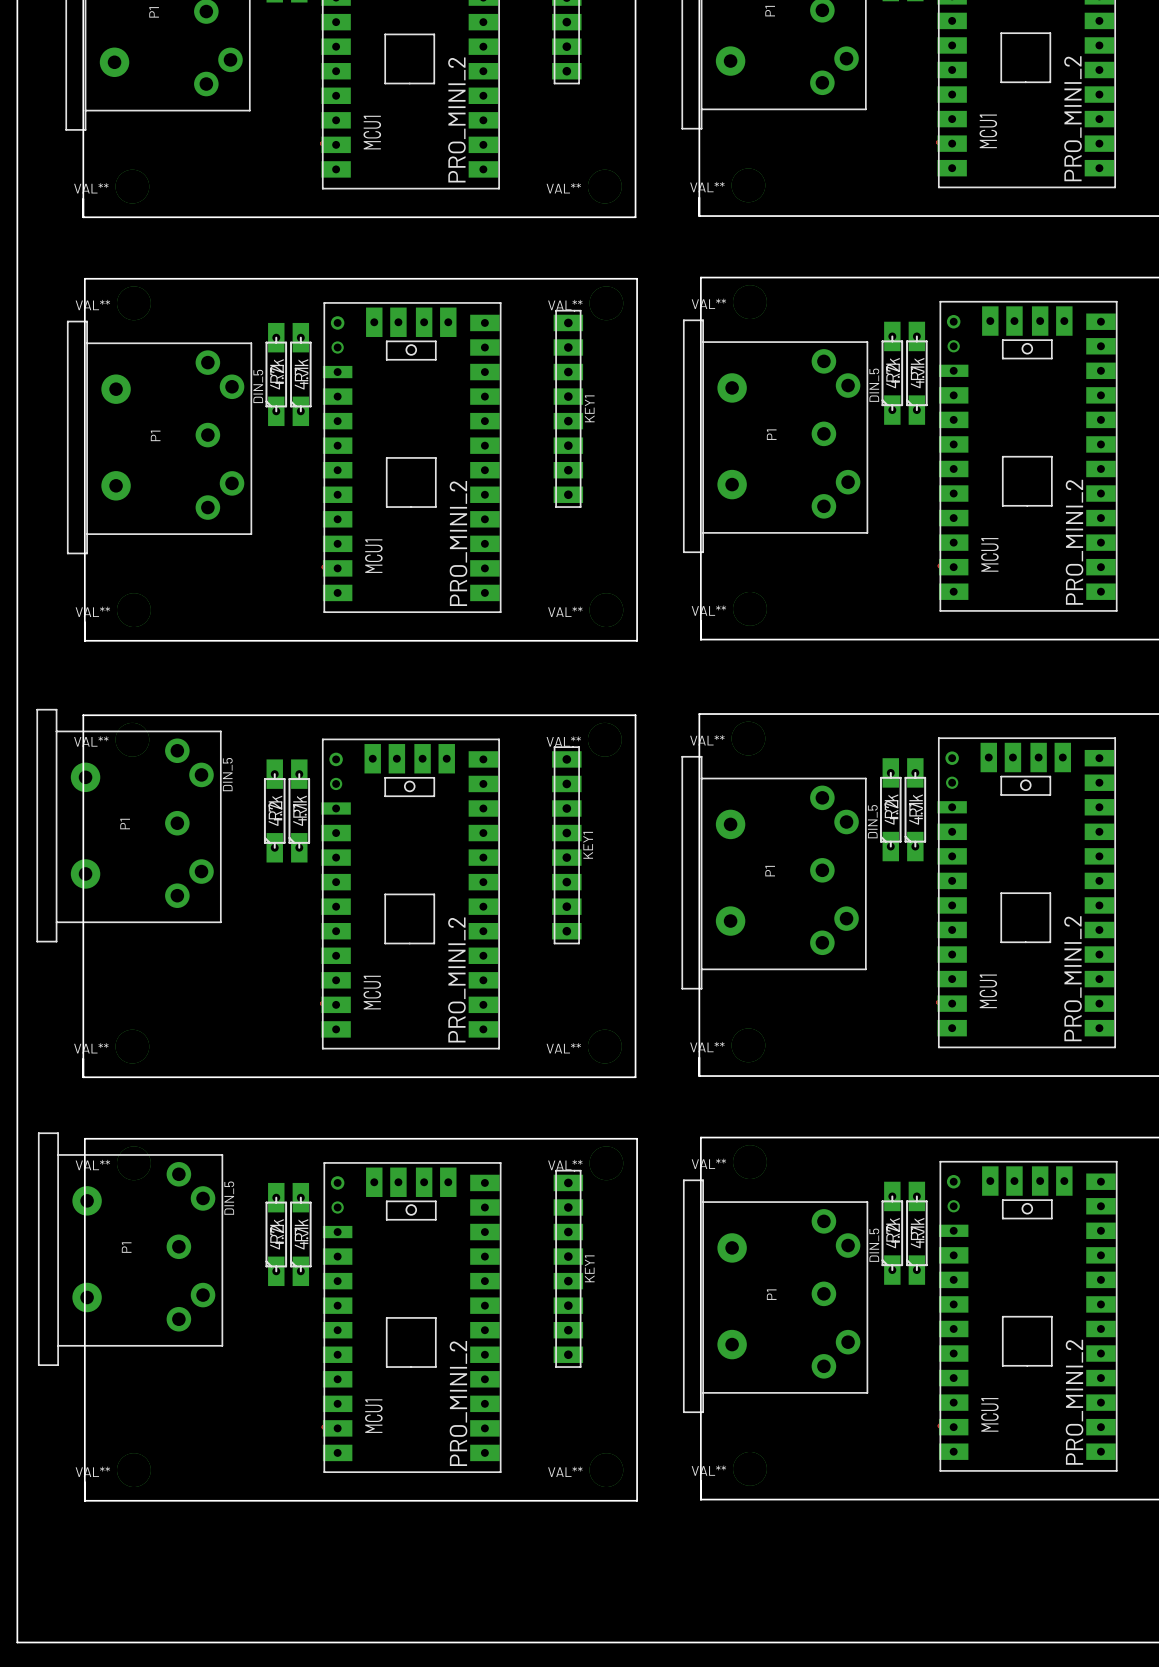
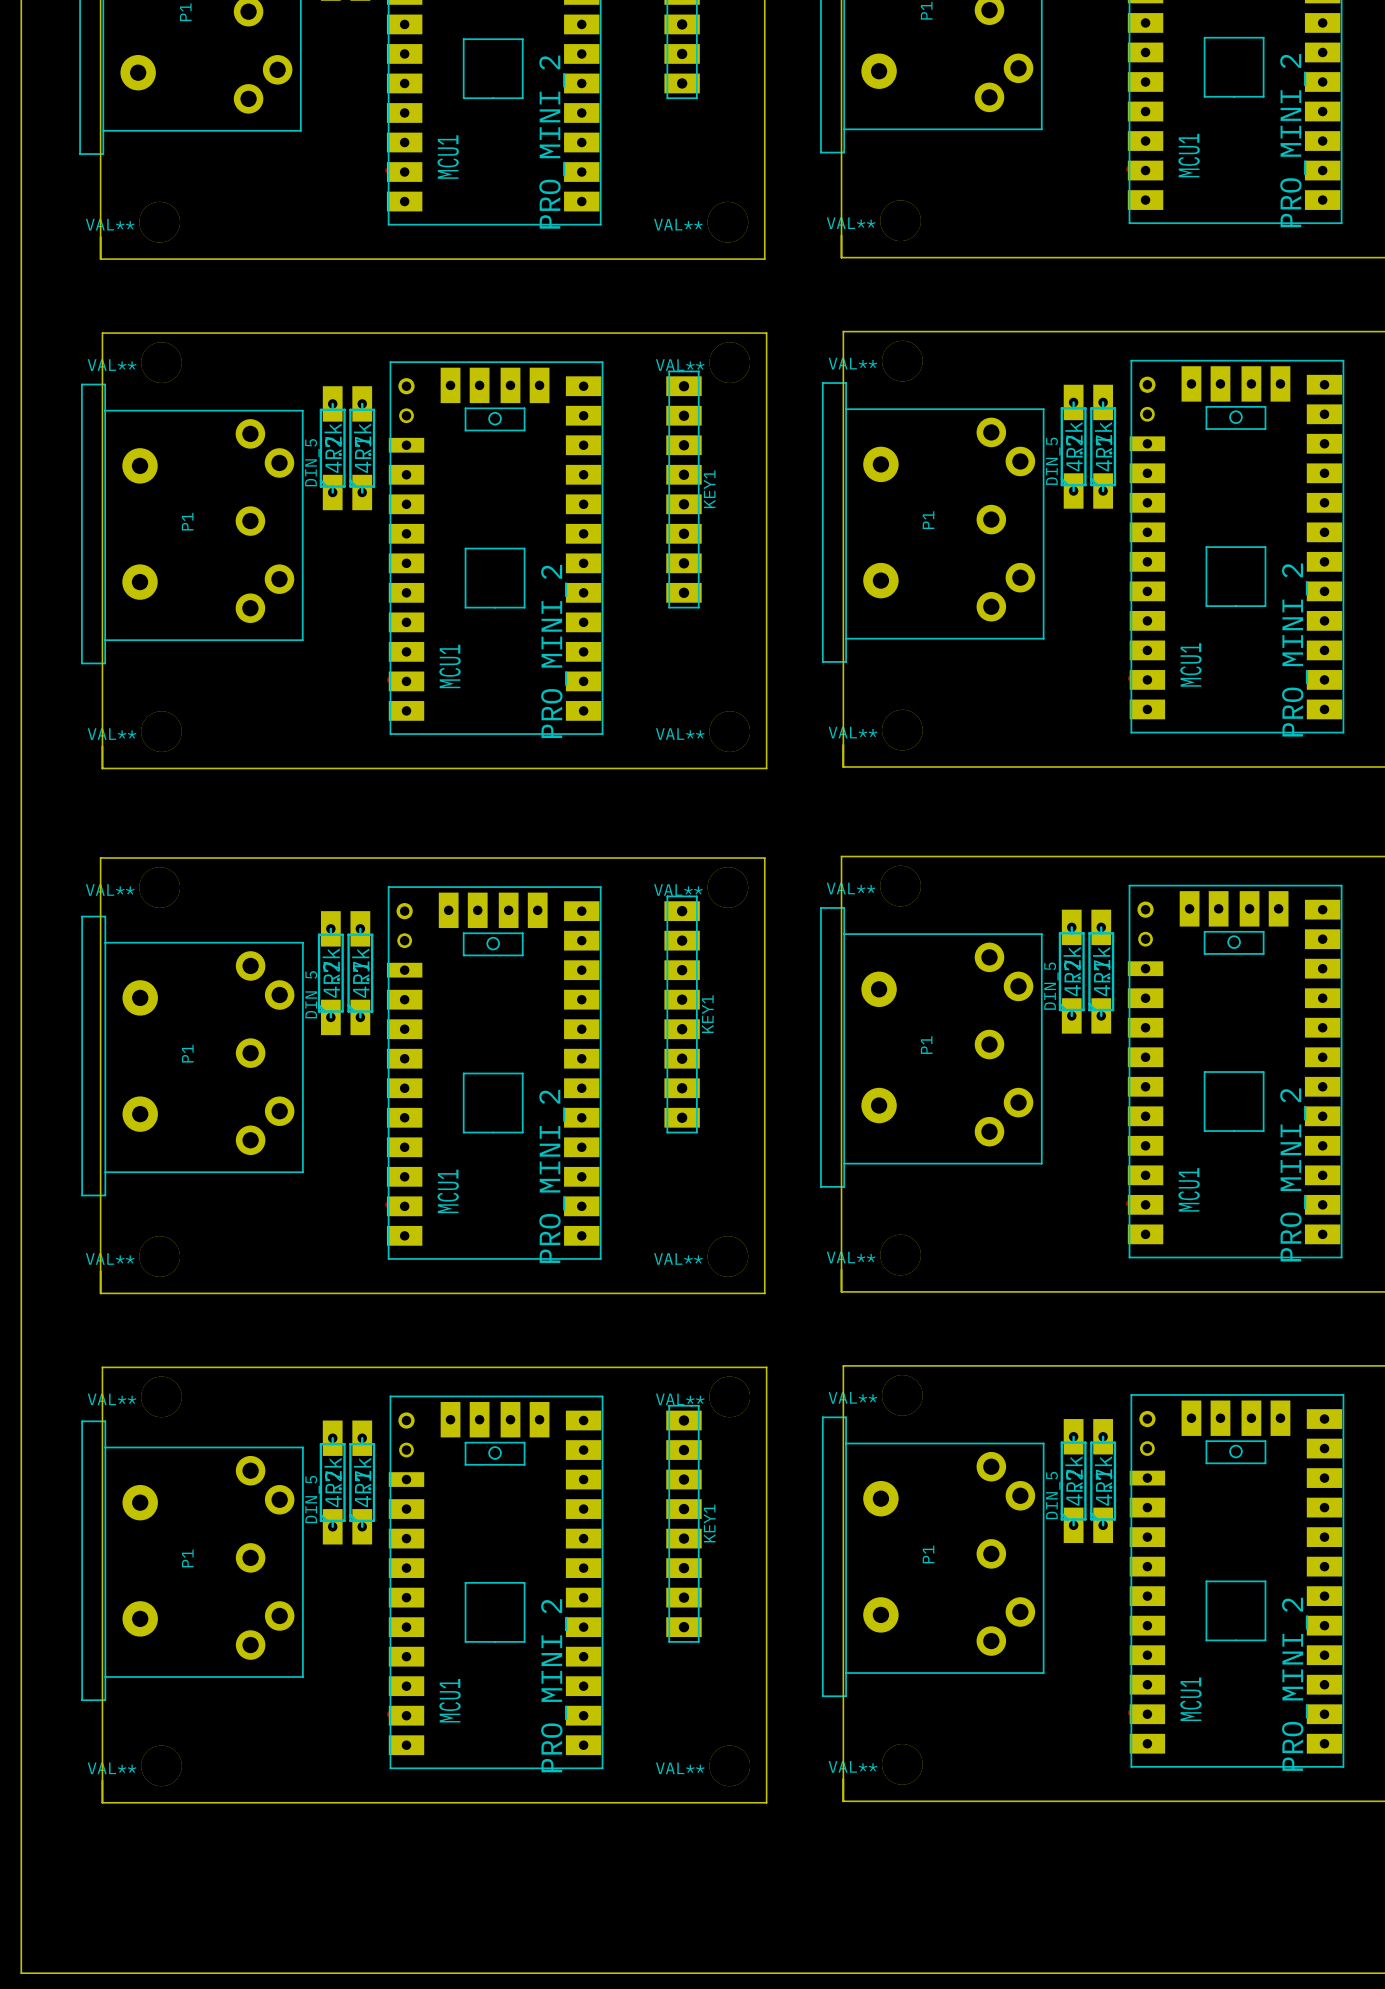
P1 position: (129, 825) -> (192, 1056)
P1 position: (130, 1249) -> (192, 1560)

